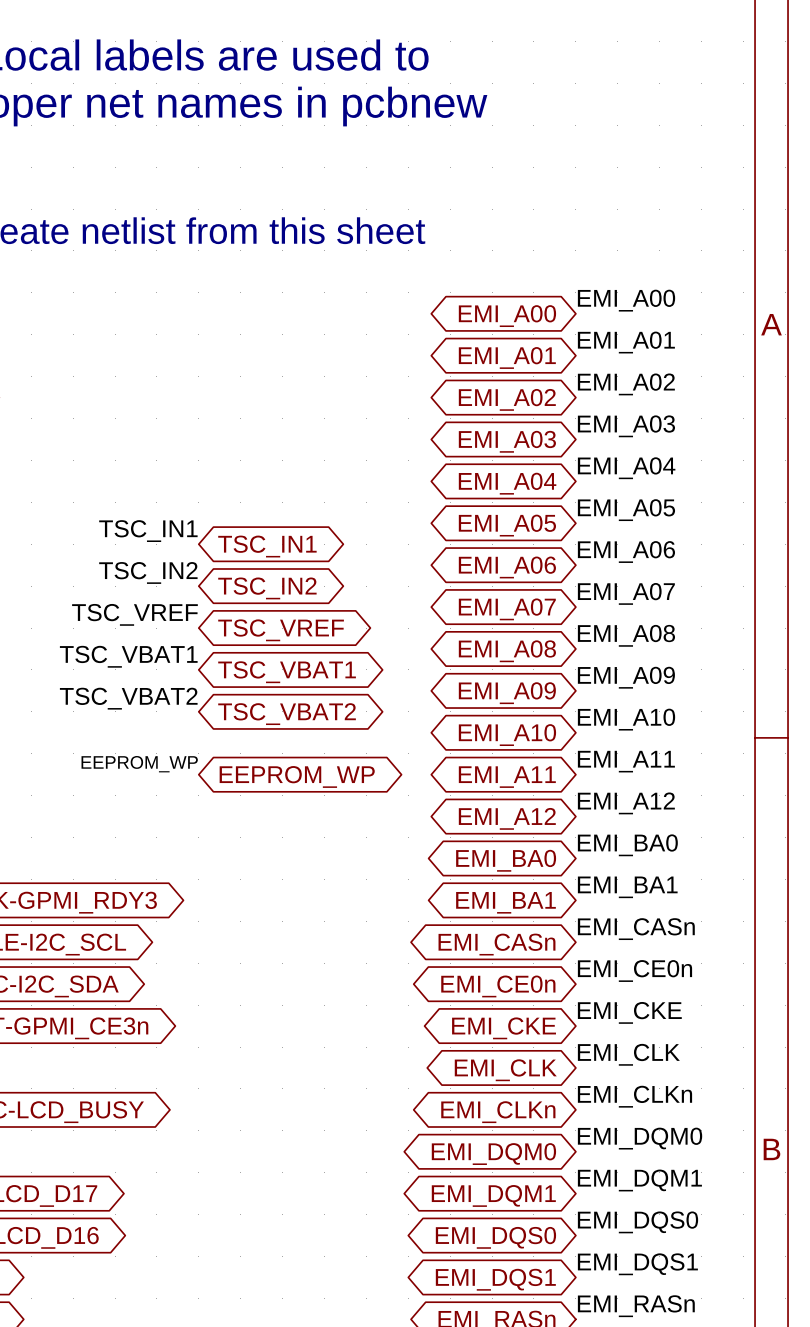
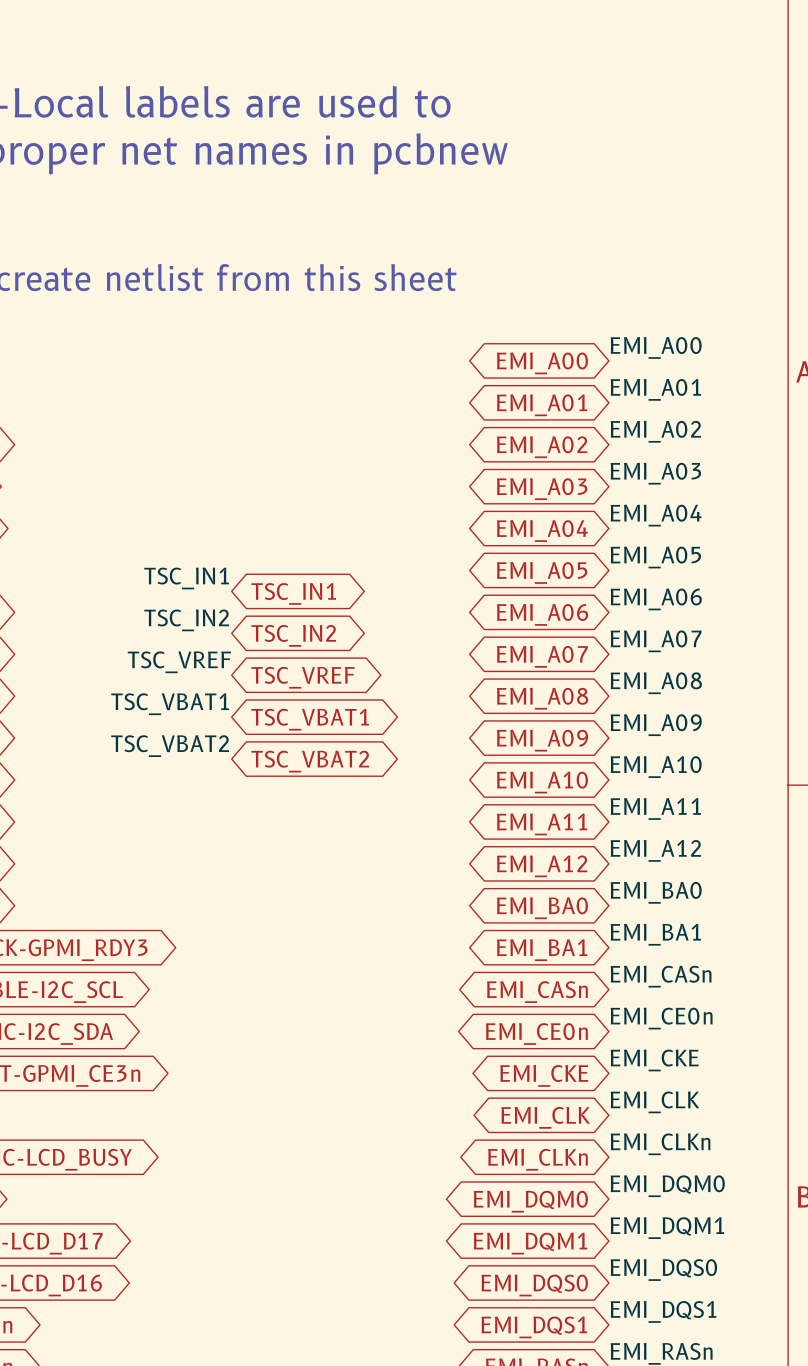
label: EEPROM_WP (139, 764) -> none
global label: EEPROM_WP (297, 776) -> none

